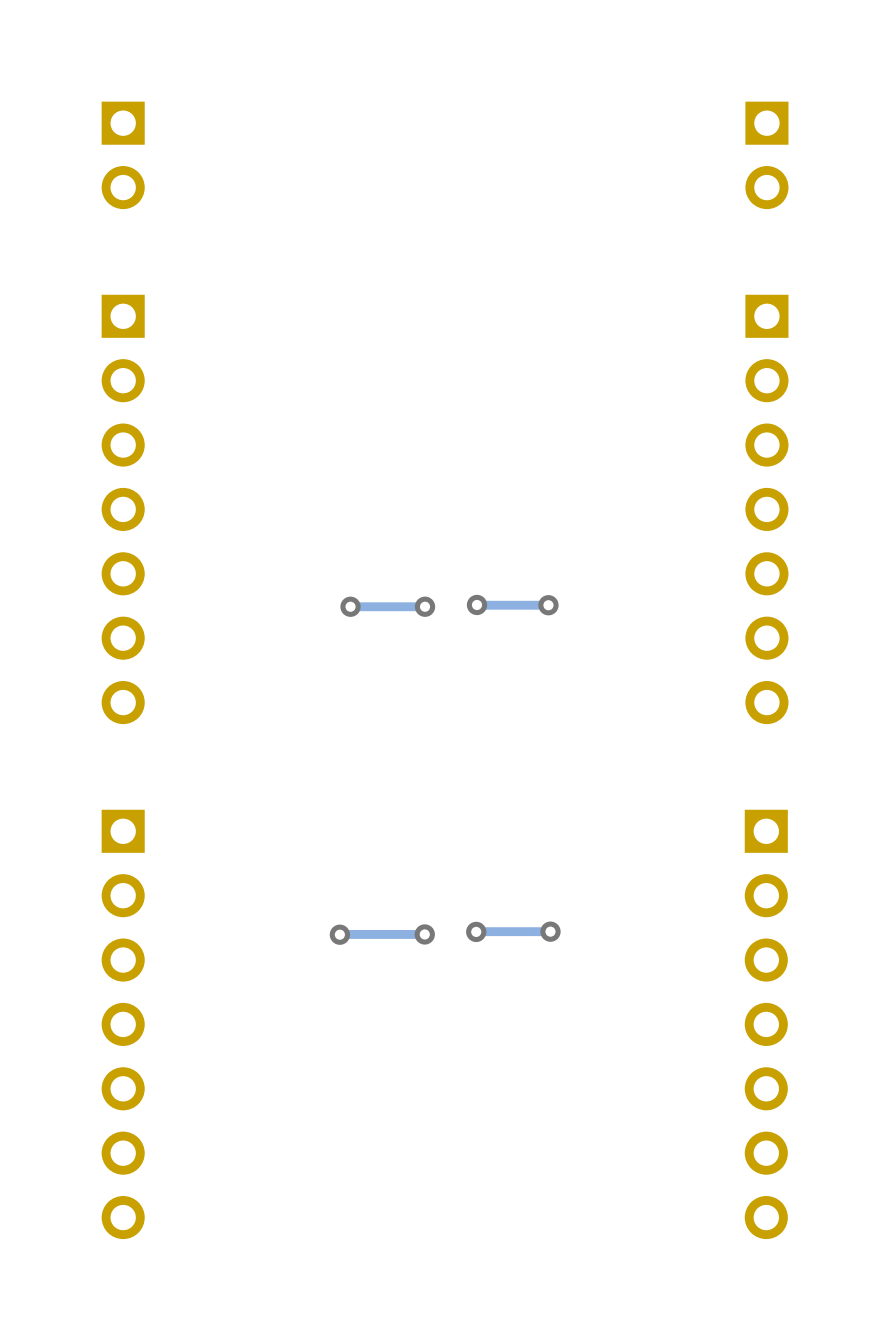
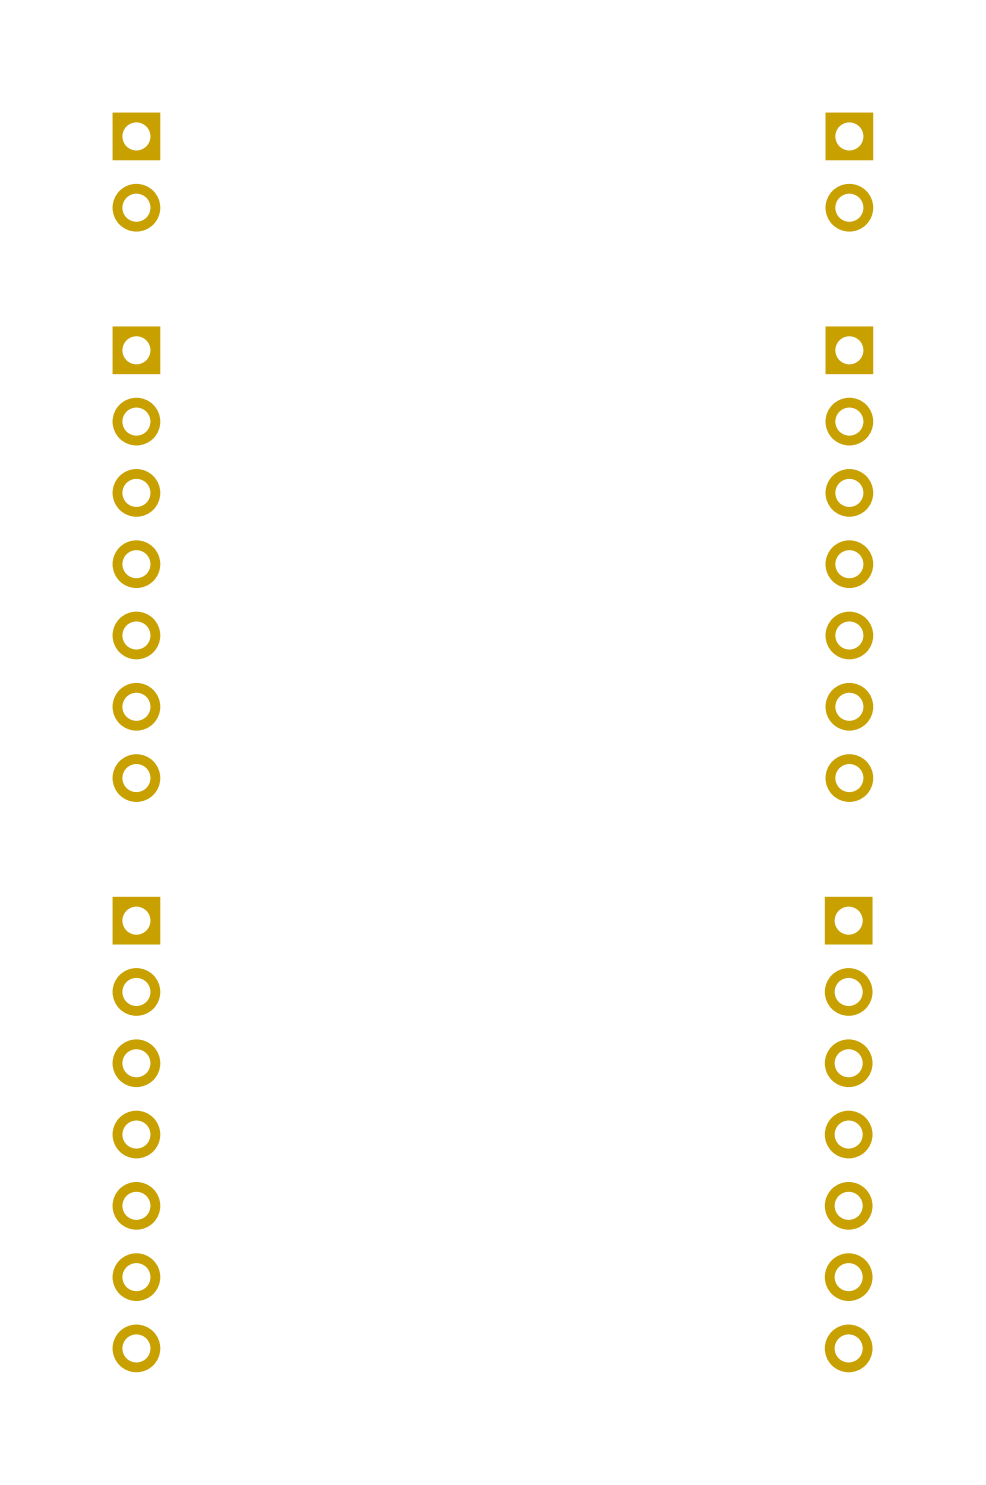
via: (476, 604) -> none
track: (548, 605) (477, 605) -> none
via: (548, 605) -> none
via: (350, 606) -> none
track: (425, 606) (350, 606) -> none
via: (425, 606) -> none
via: (476, 931) -> none
track: (550, 931) (476, 931) -> none
via: (550, 931) -> none
via: (339, 934) -> none
track: (424, 934) (340, 934) -> none
via: (424, 934) -> none

